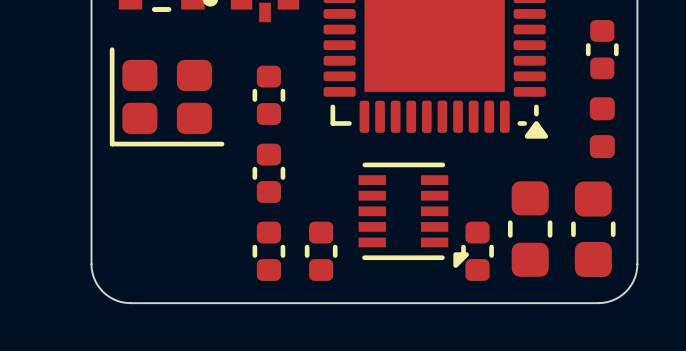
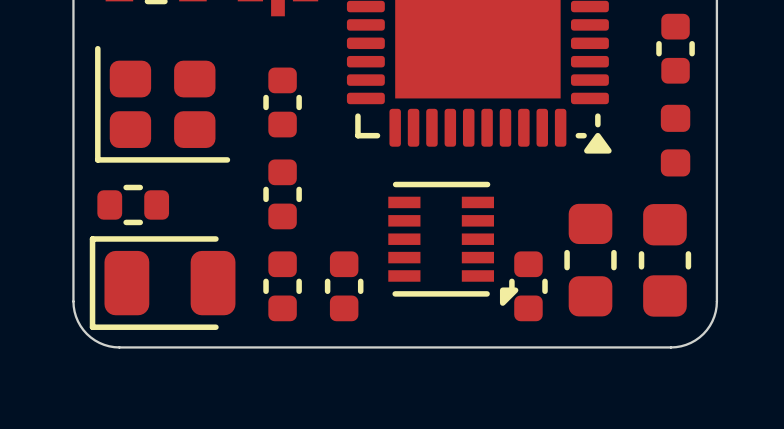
part: none -> (133, 204)
part: none -> (162, 283)

